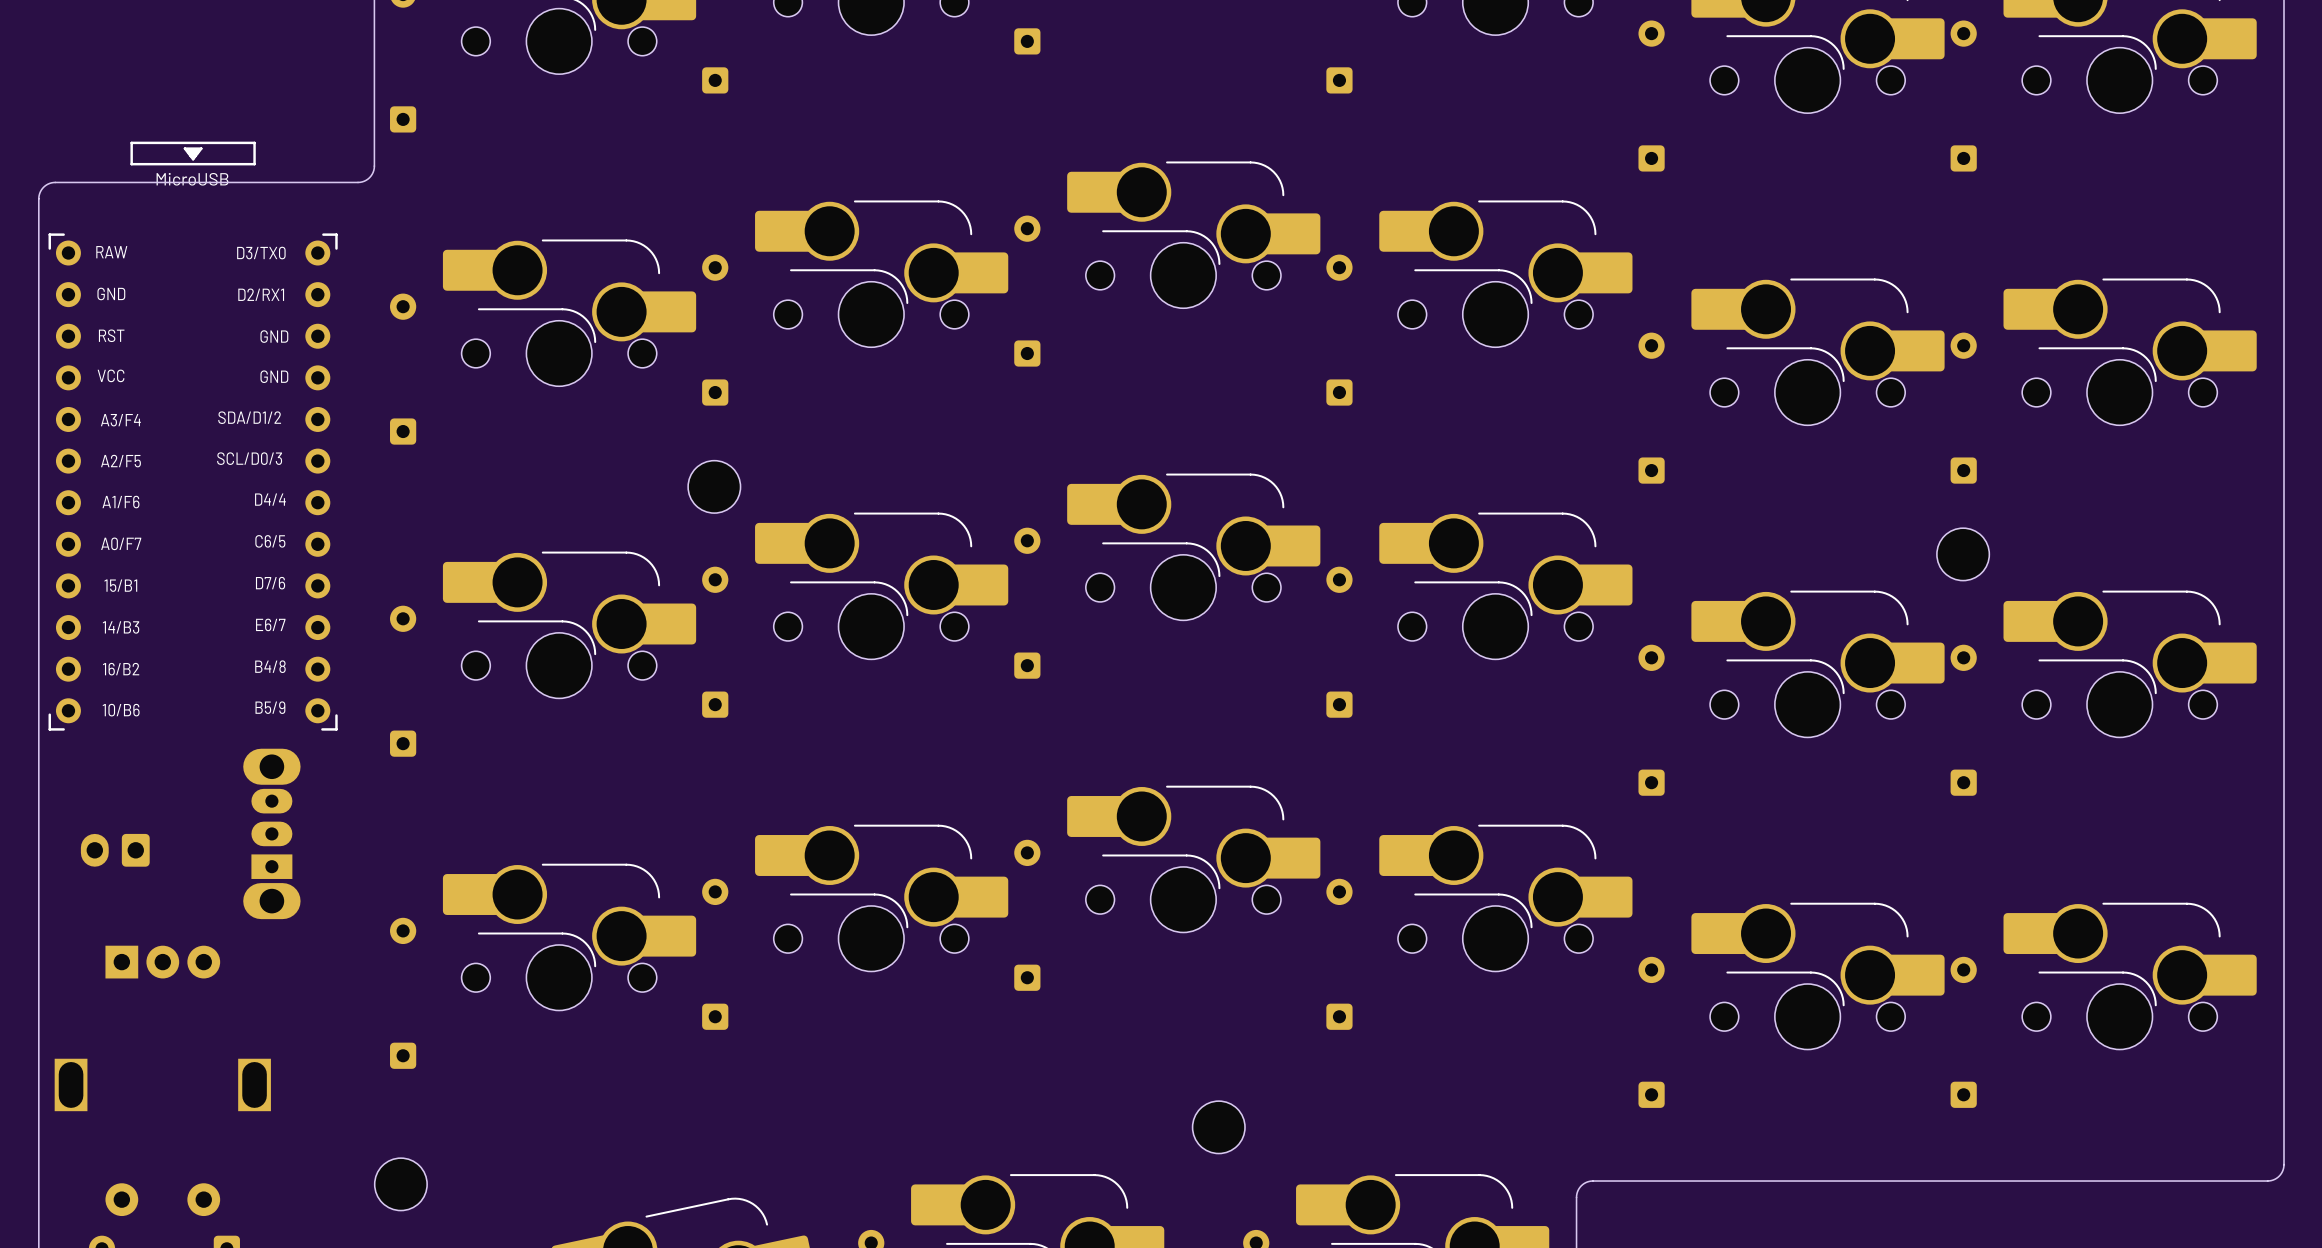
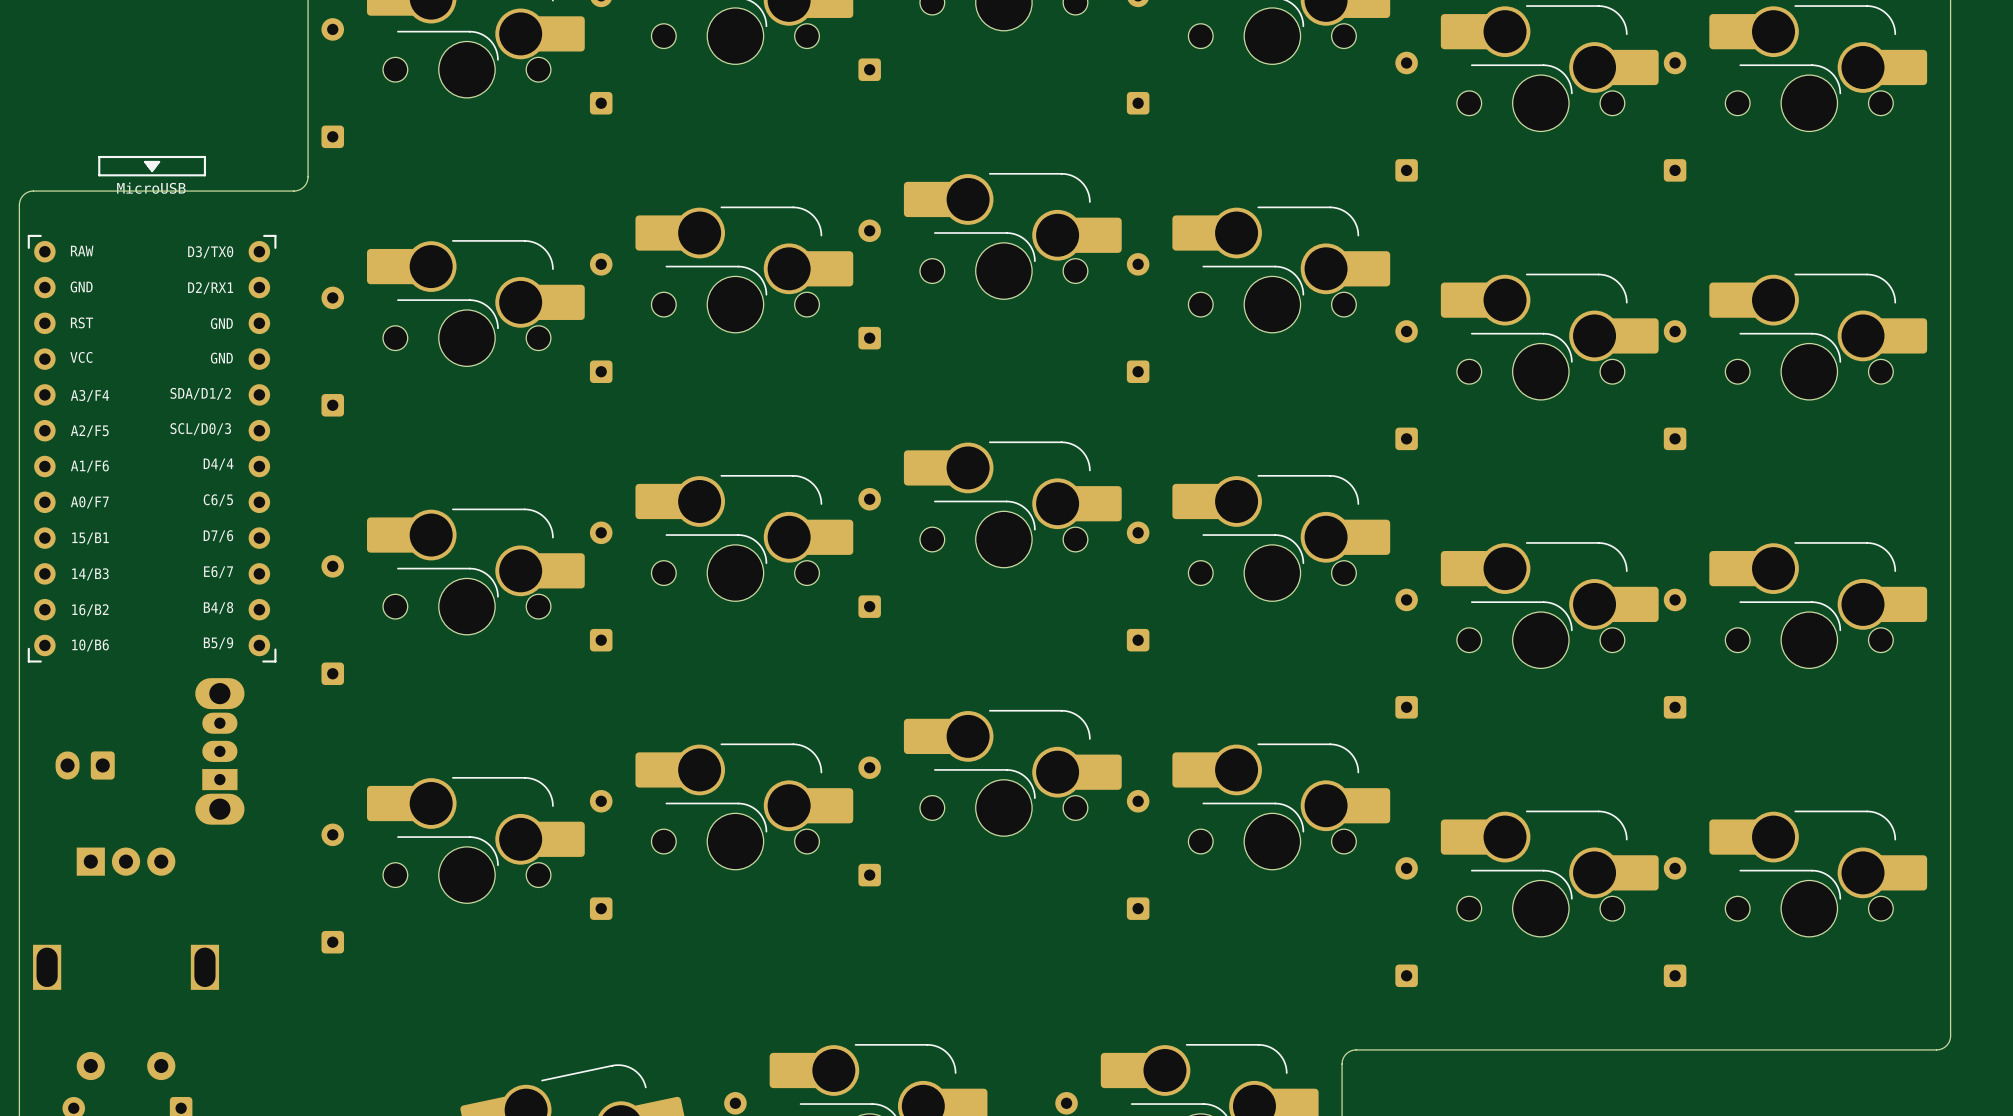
part: (714, 486) -> none
part: (1963, 554) -> none
part: (1218, 1127) -> none
part: (400, 1184) -> none

